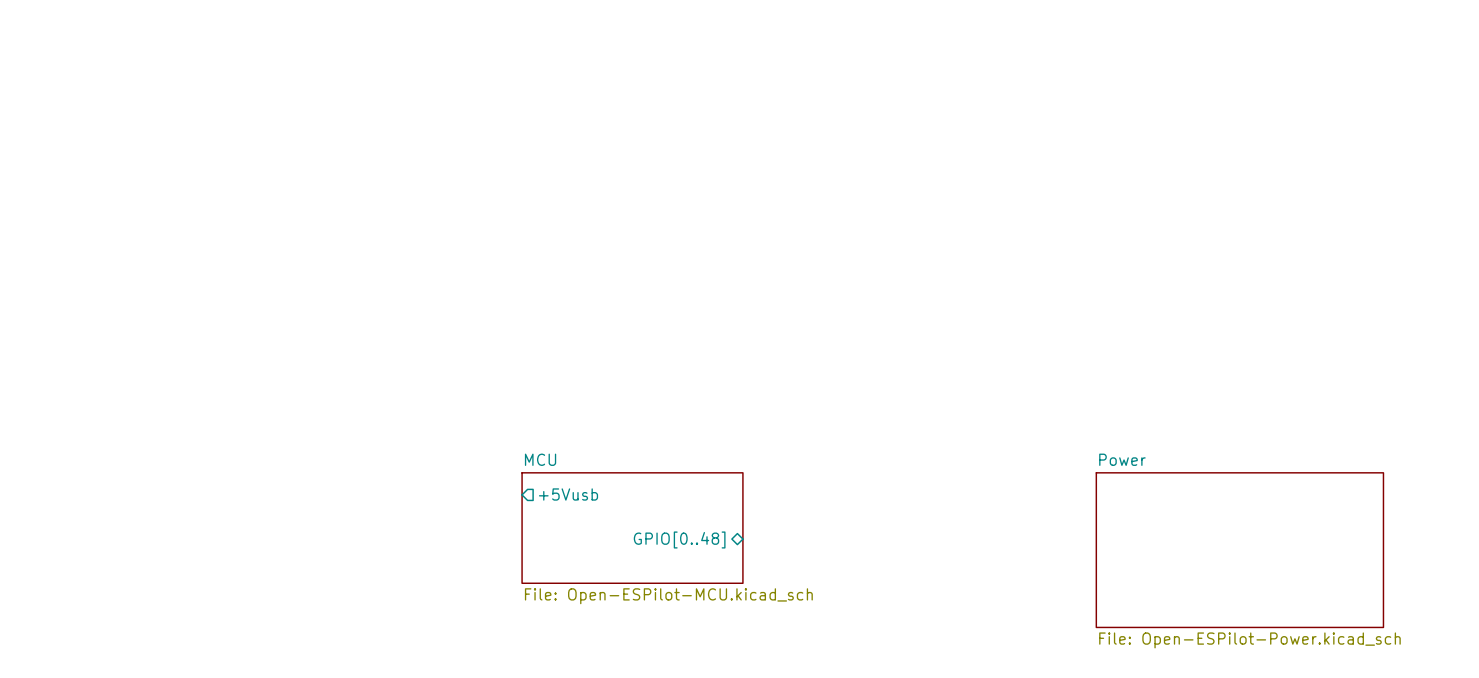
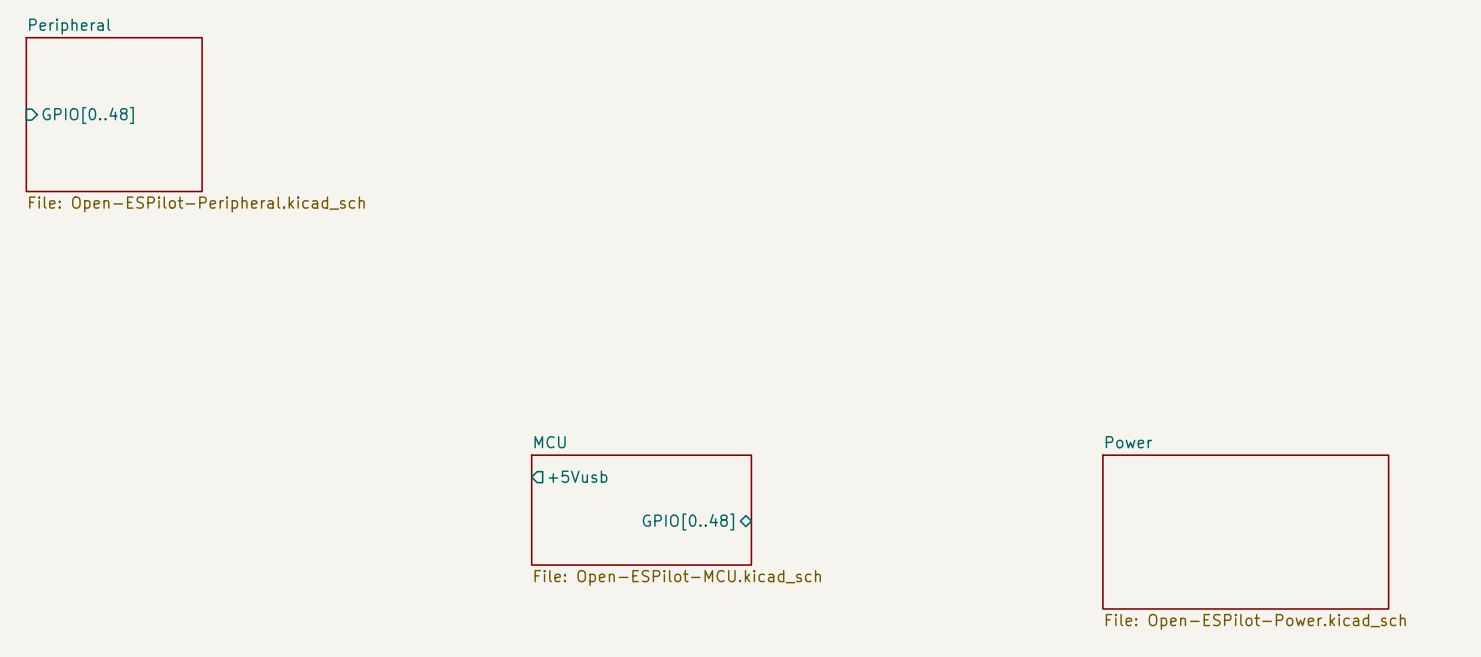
sheet Peripheral: none -> File: Open-ESPilot-Peripheral.kicad_sch (114, 114)
sheet pin: none -> GPIO[0..48] (88, 115)

